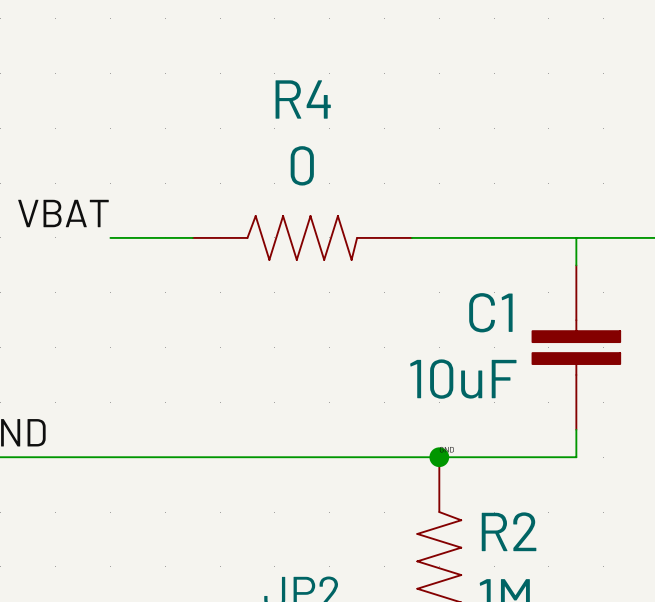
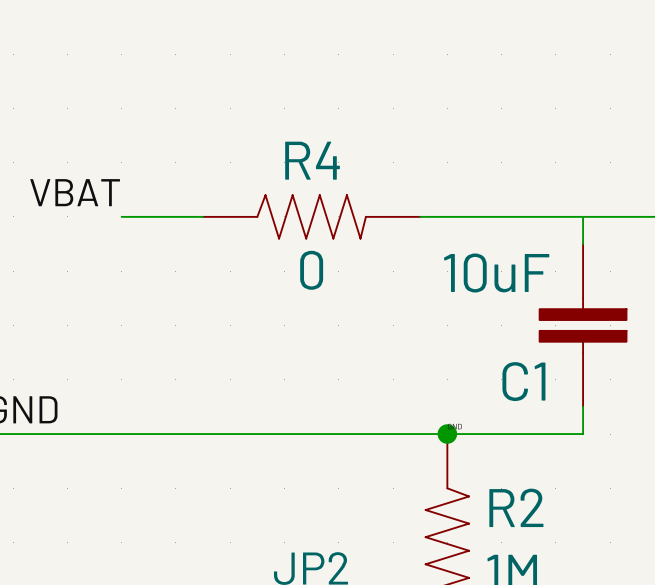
R4 name position: R4 (303, 99) -> R4 (312, 160)
R4 value position: 0 (302, 165) -> 0 (311, 270)
C1 name position: C1 (490, 312) -> C1 (523, 381)
C1 value position: 10uF (463, 379) -> 10uF (496, 273)

